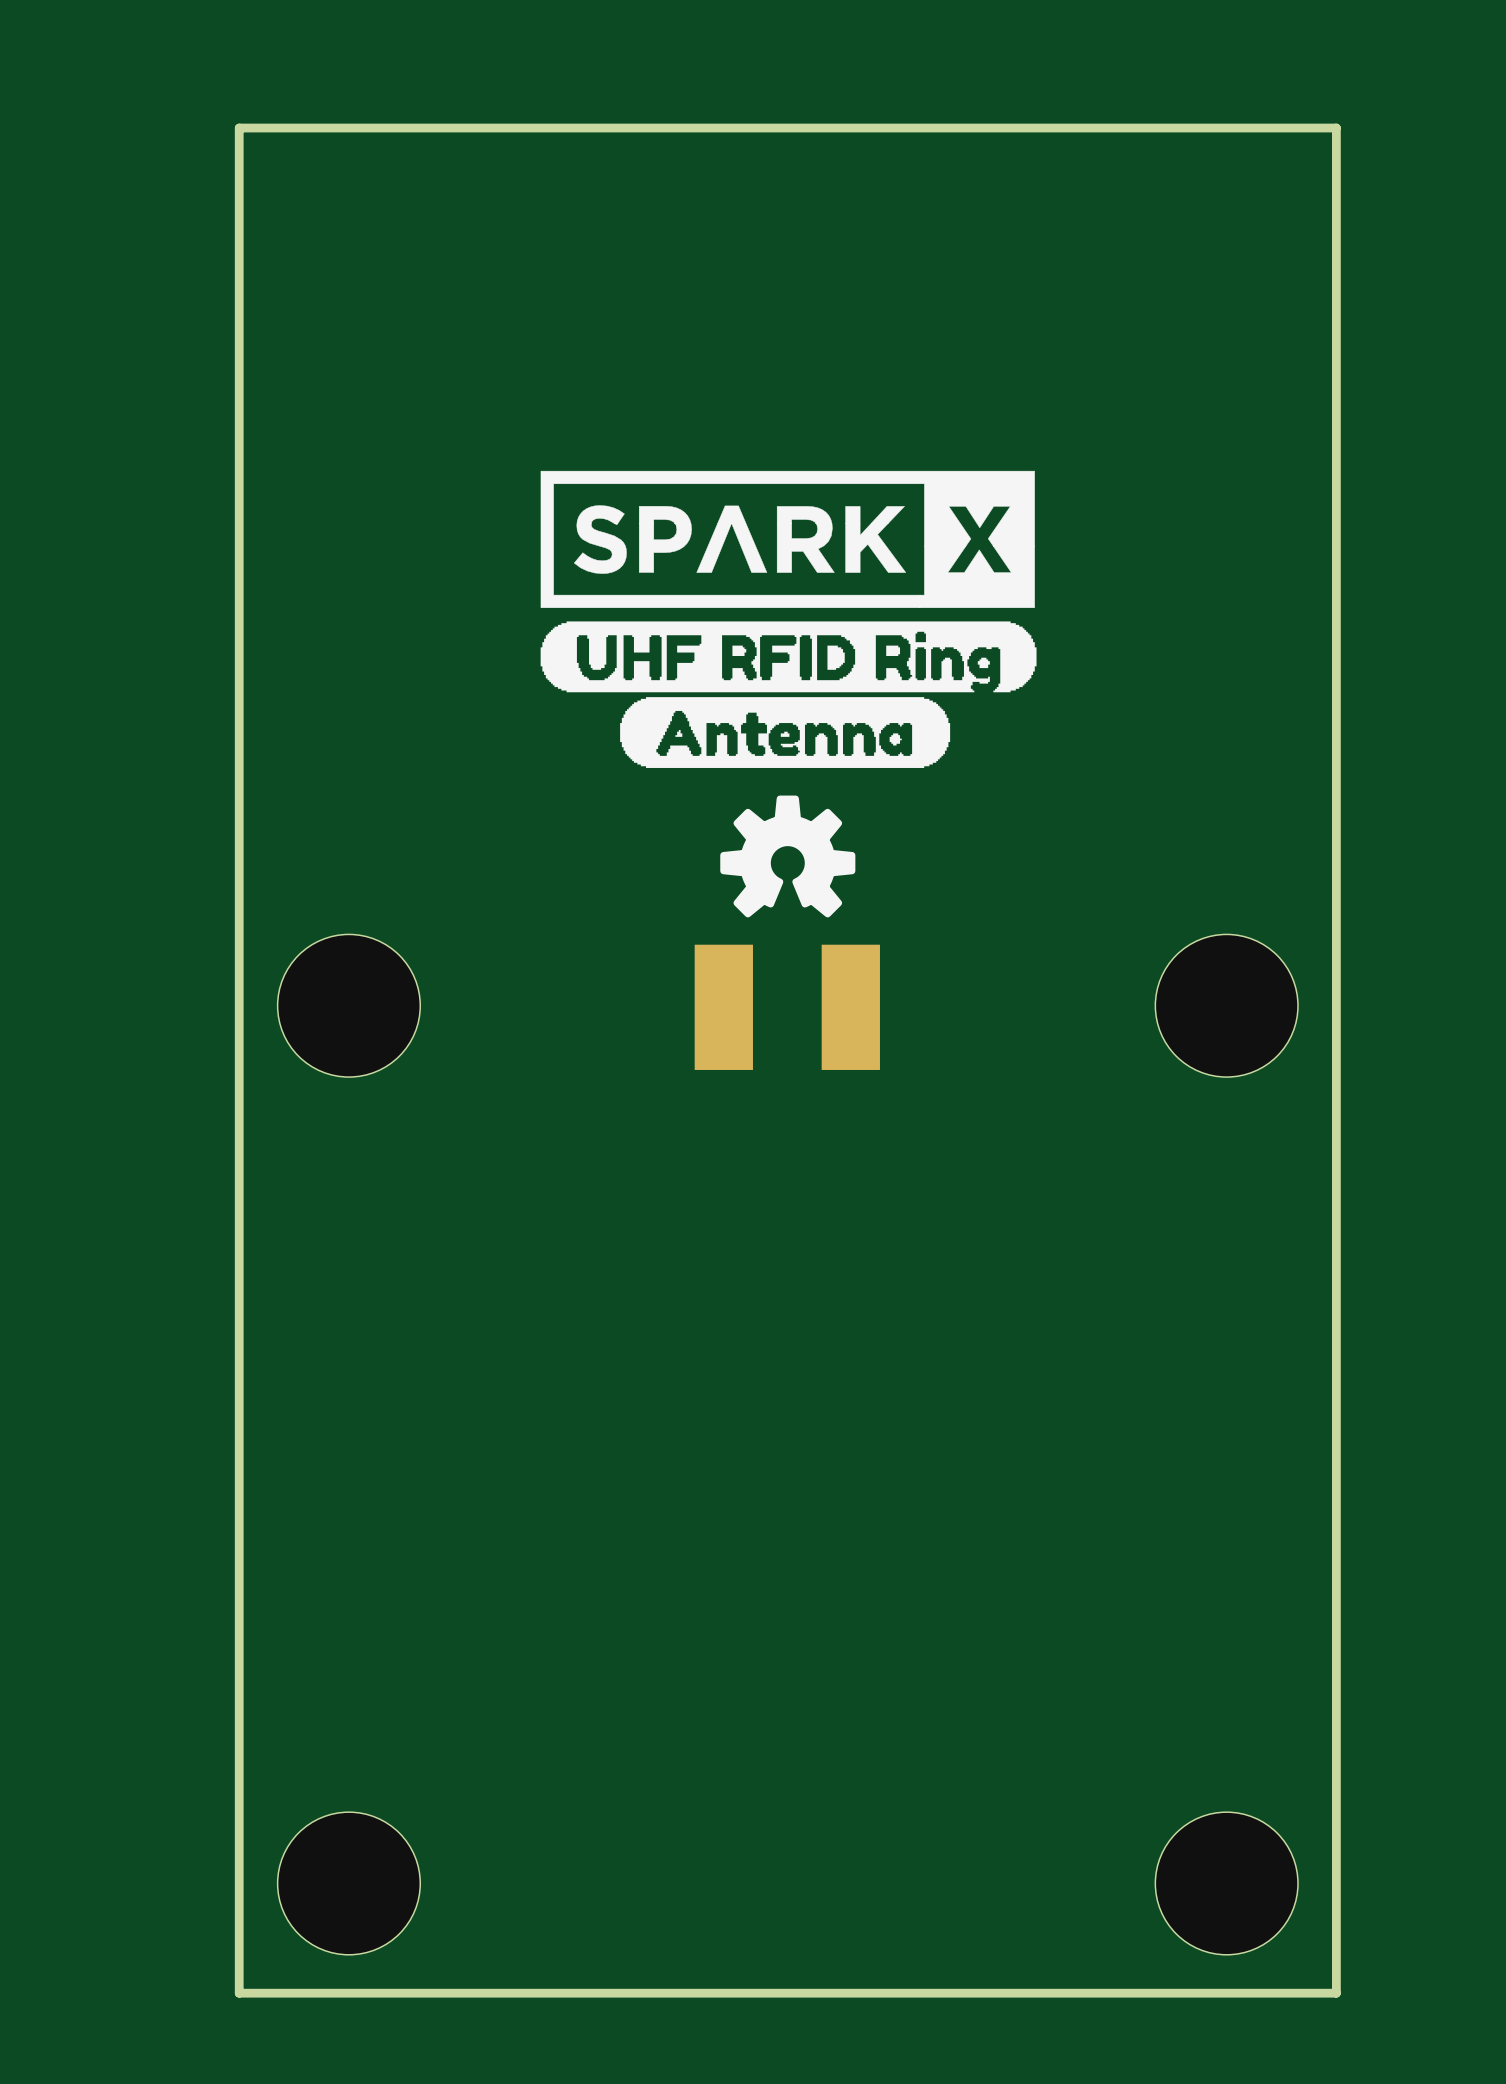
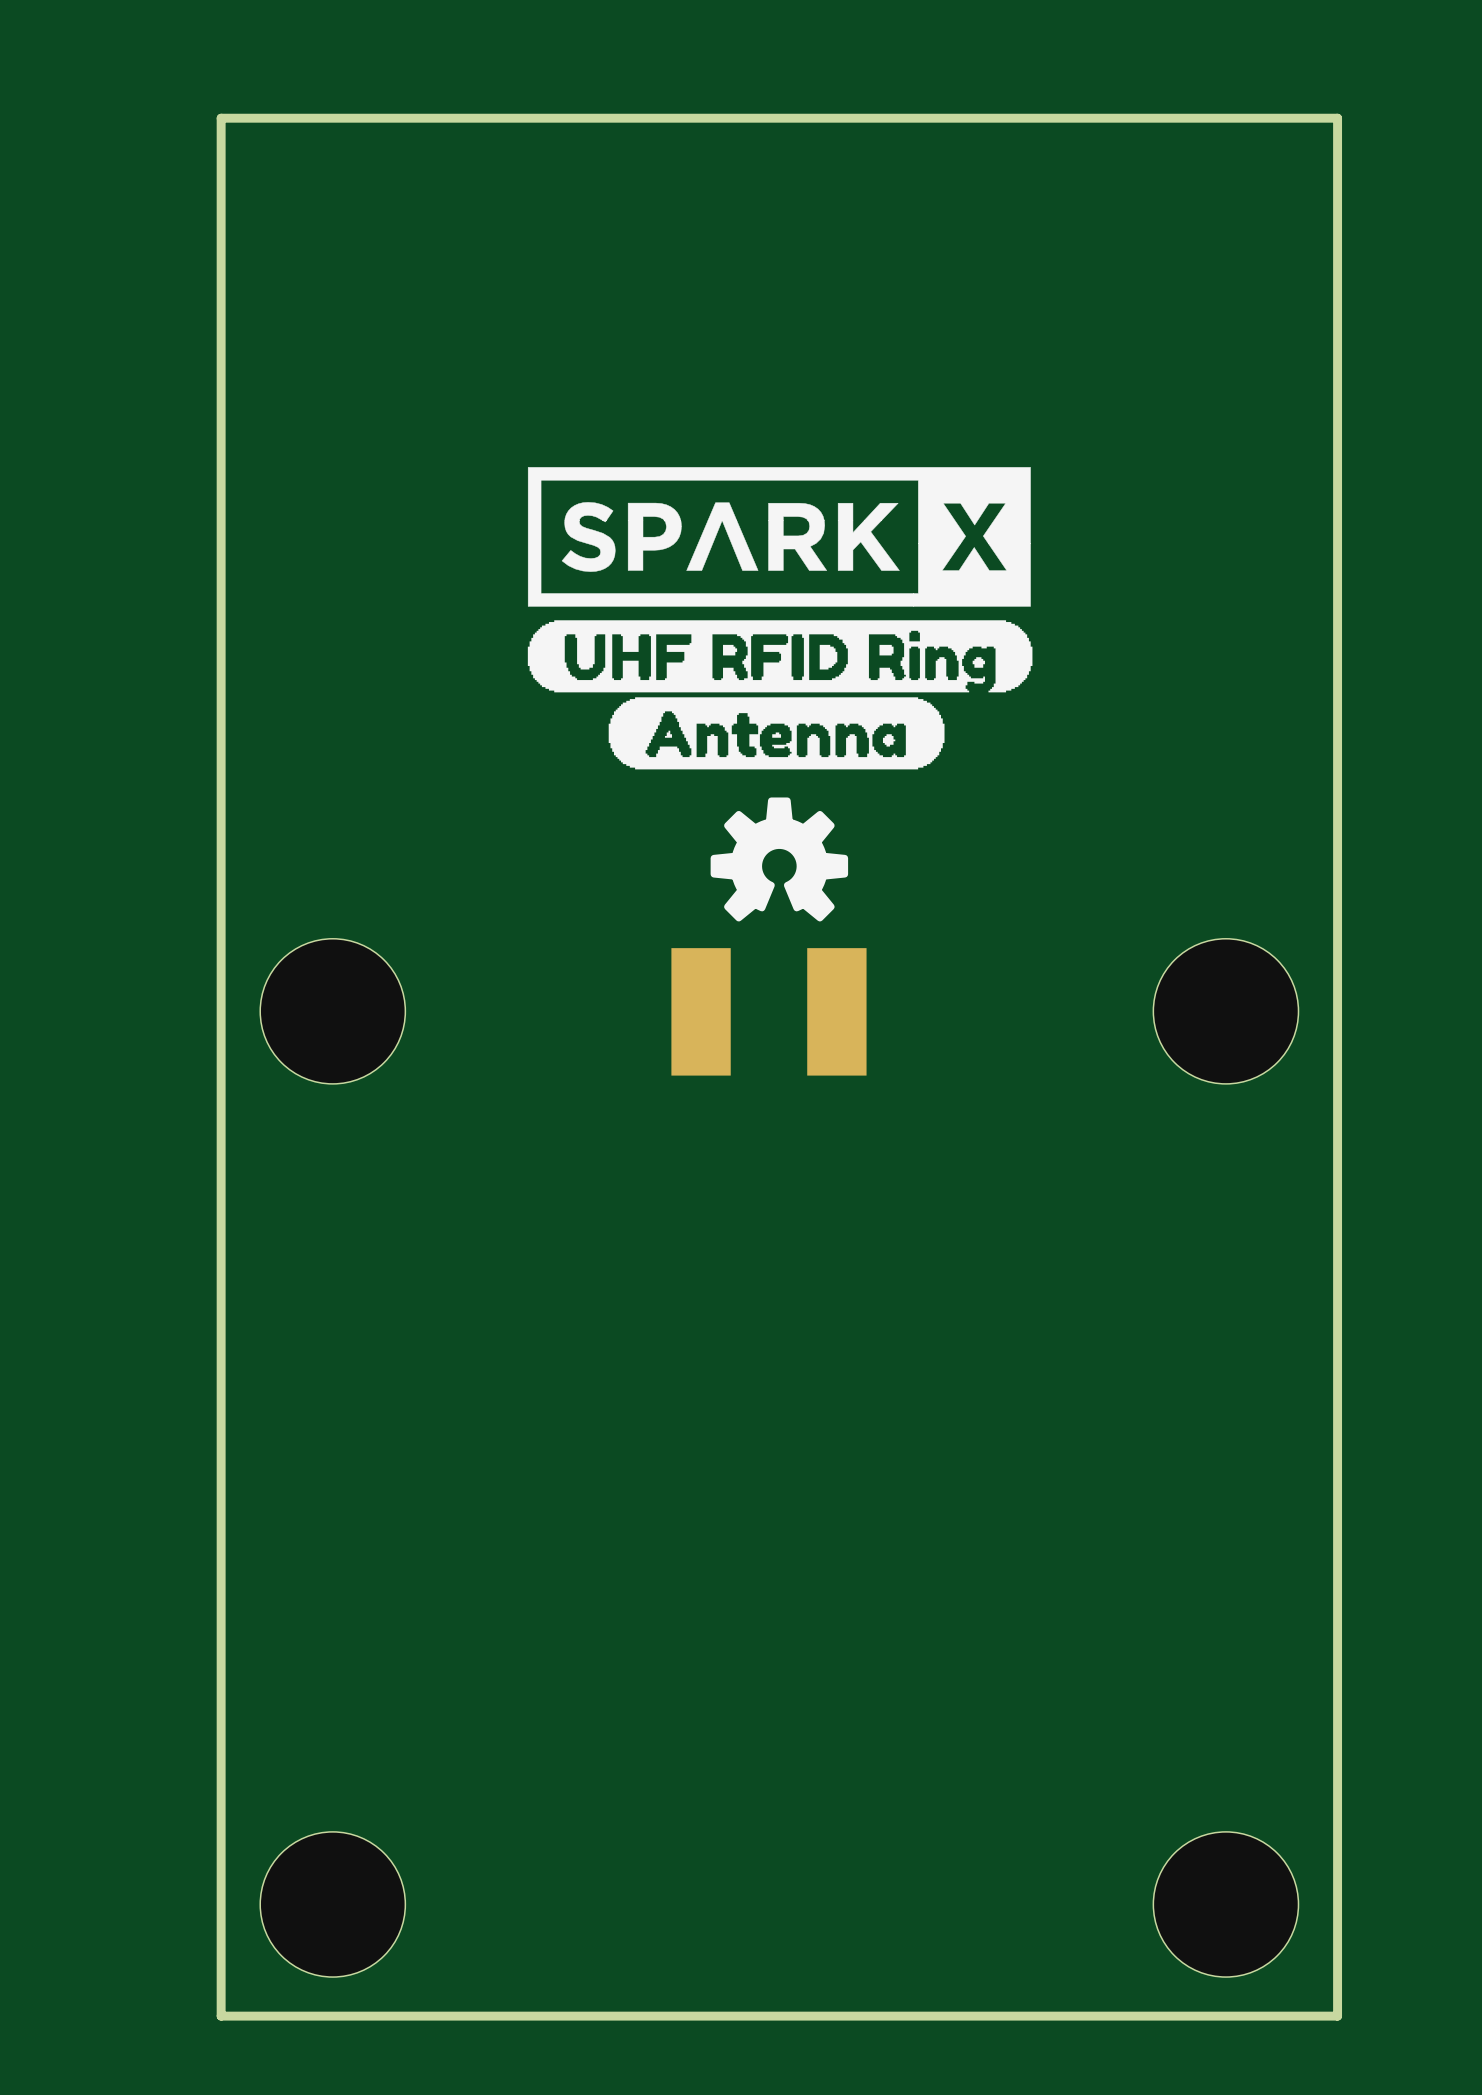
part footprint: [694, 944, 880, 1070] -> [671, 948, 867, 1076]

